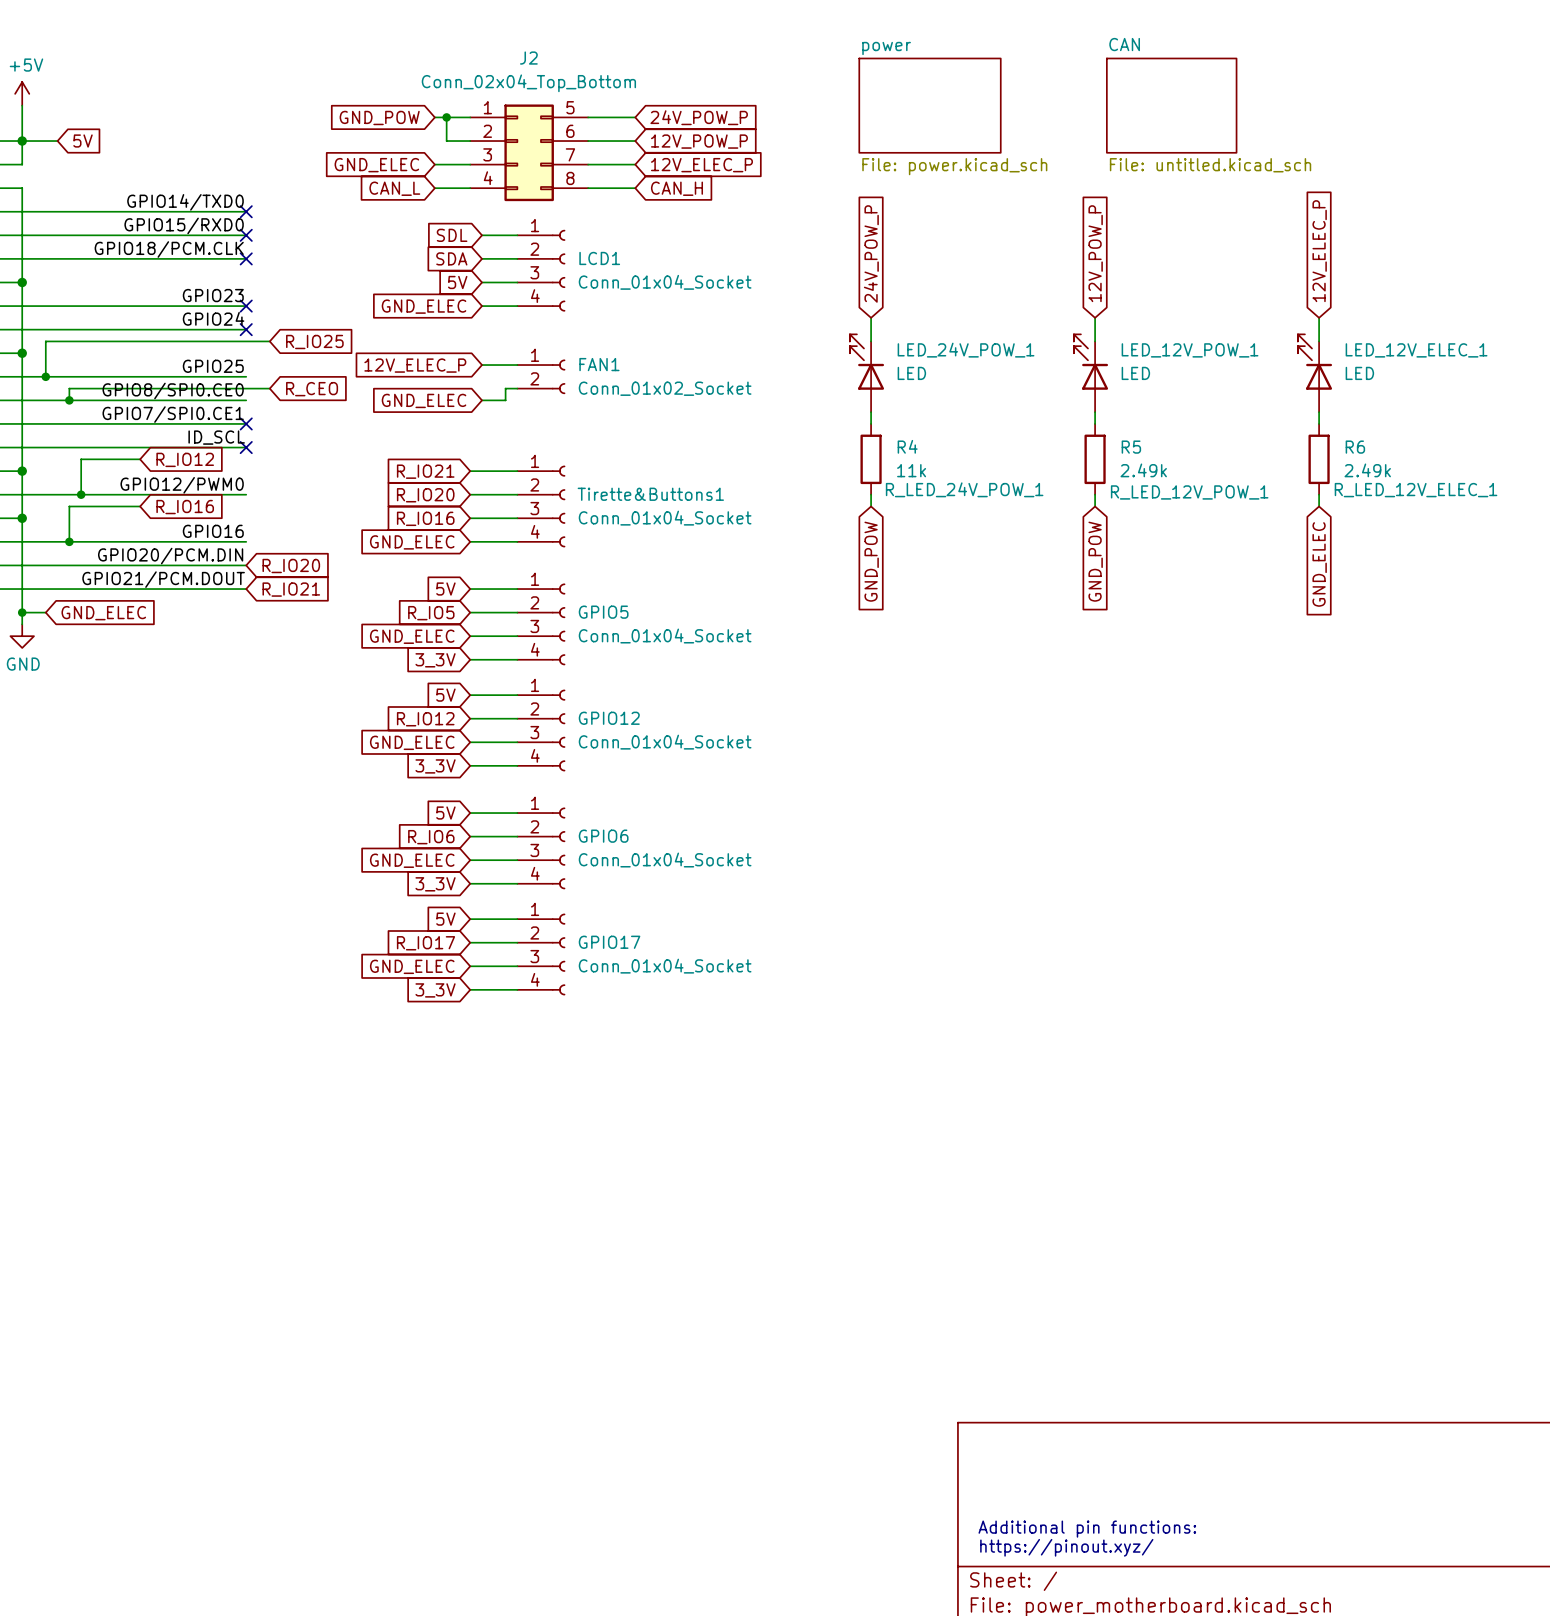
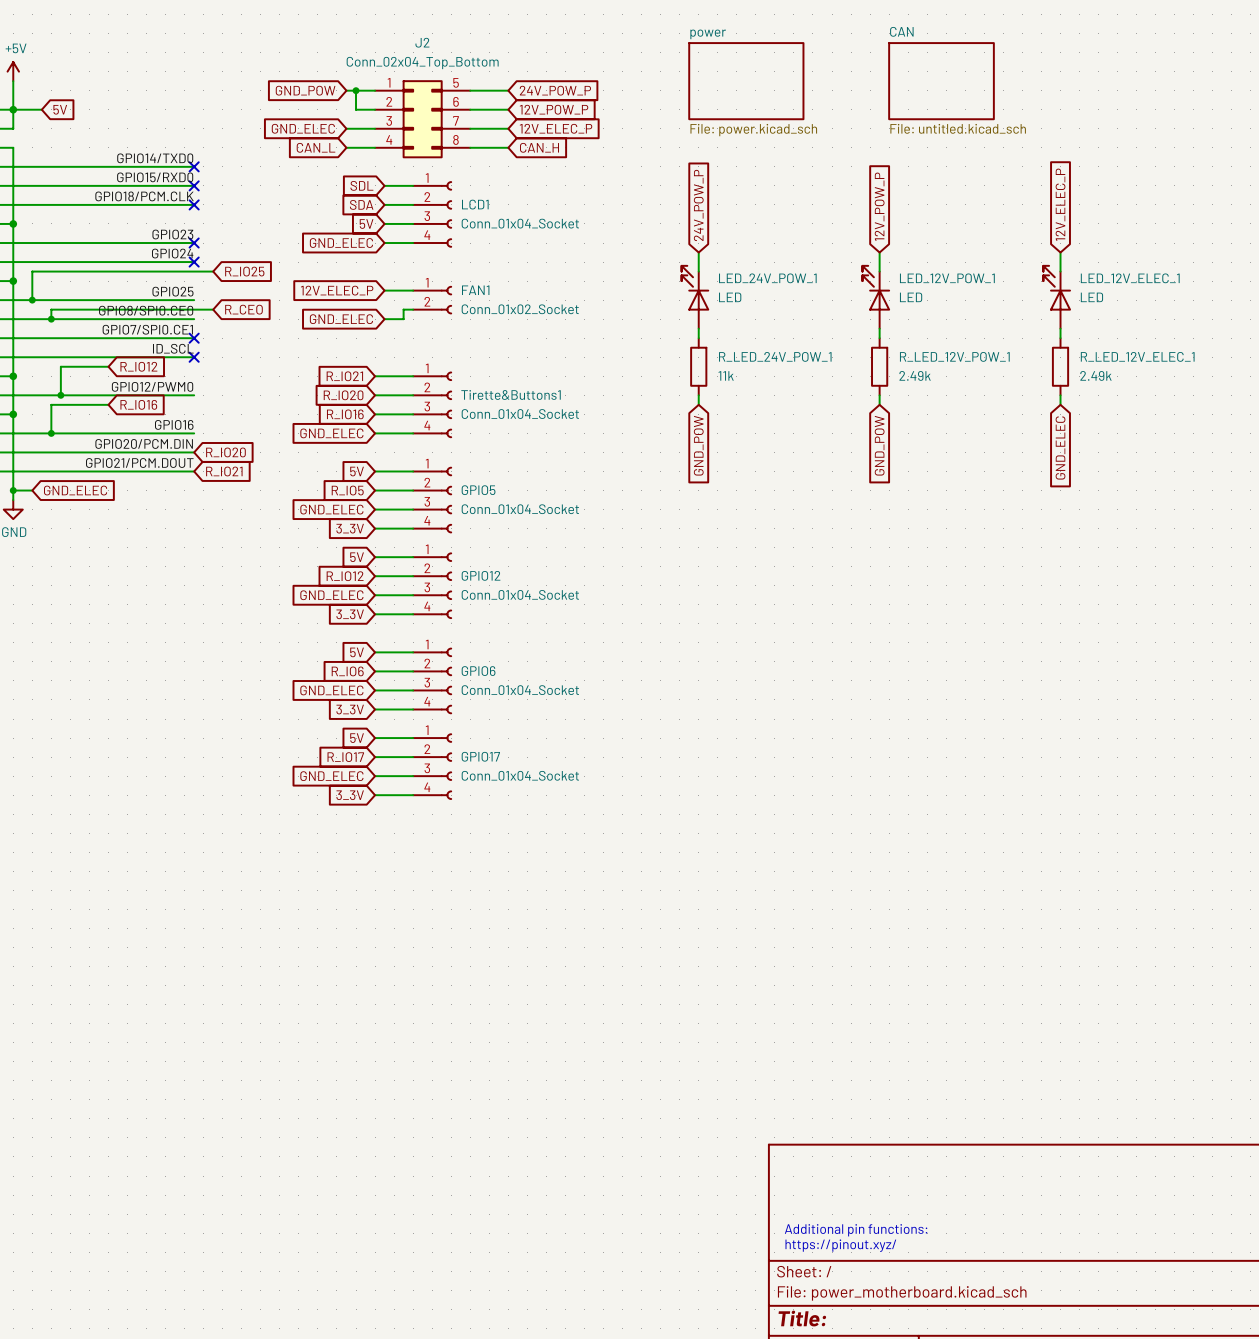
R4 name: R4 (907, 446) -> R_LED_24V_POW_1 (775, 356)
R5 name: R5 (1131, 447) -> R_LED_12V_POW_1 (954, 356)
R6 name: R6 (1355, 447) -> R_LED_12V_ELEC_1 (1137, 356)
R4 text: R_LED_24V_POW_1 (964, 489) -> none
R6 text: R_LED_12V_ELEC_1 (1416, 490) -> none
R5 text: R_LED_12V_POW_1 (1189, 492) -> none

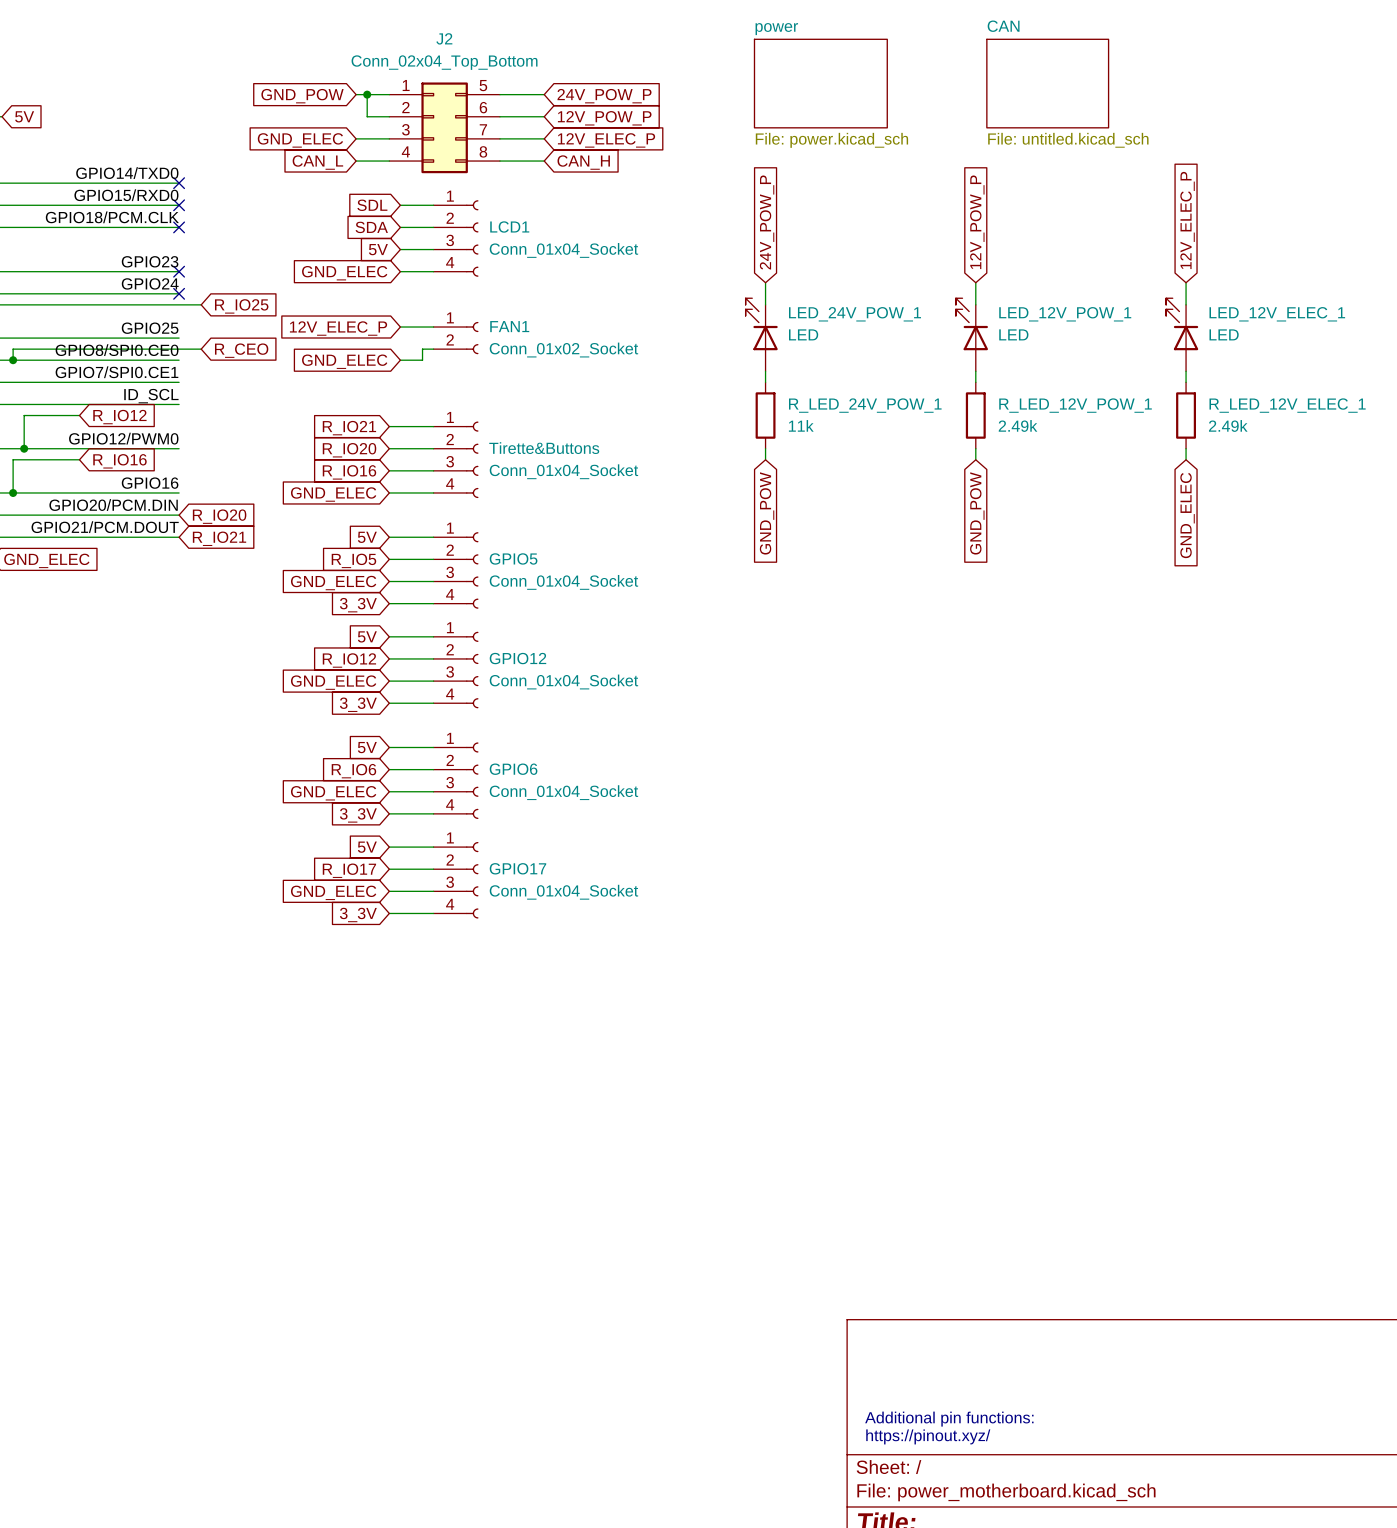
no-connect mark: (194, 338) -> none
no-connect mark: (194, 357) -> none
Tirette&Buttons1 name: Tirette&Buttons1 (511, 394) -> Tirette&Buttons (544, 448)

